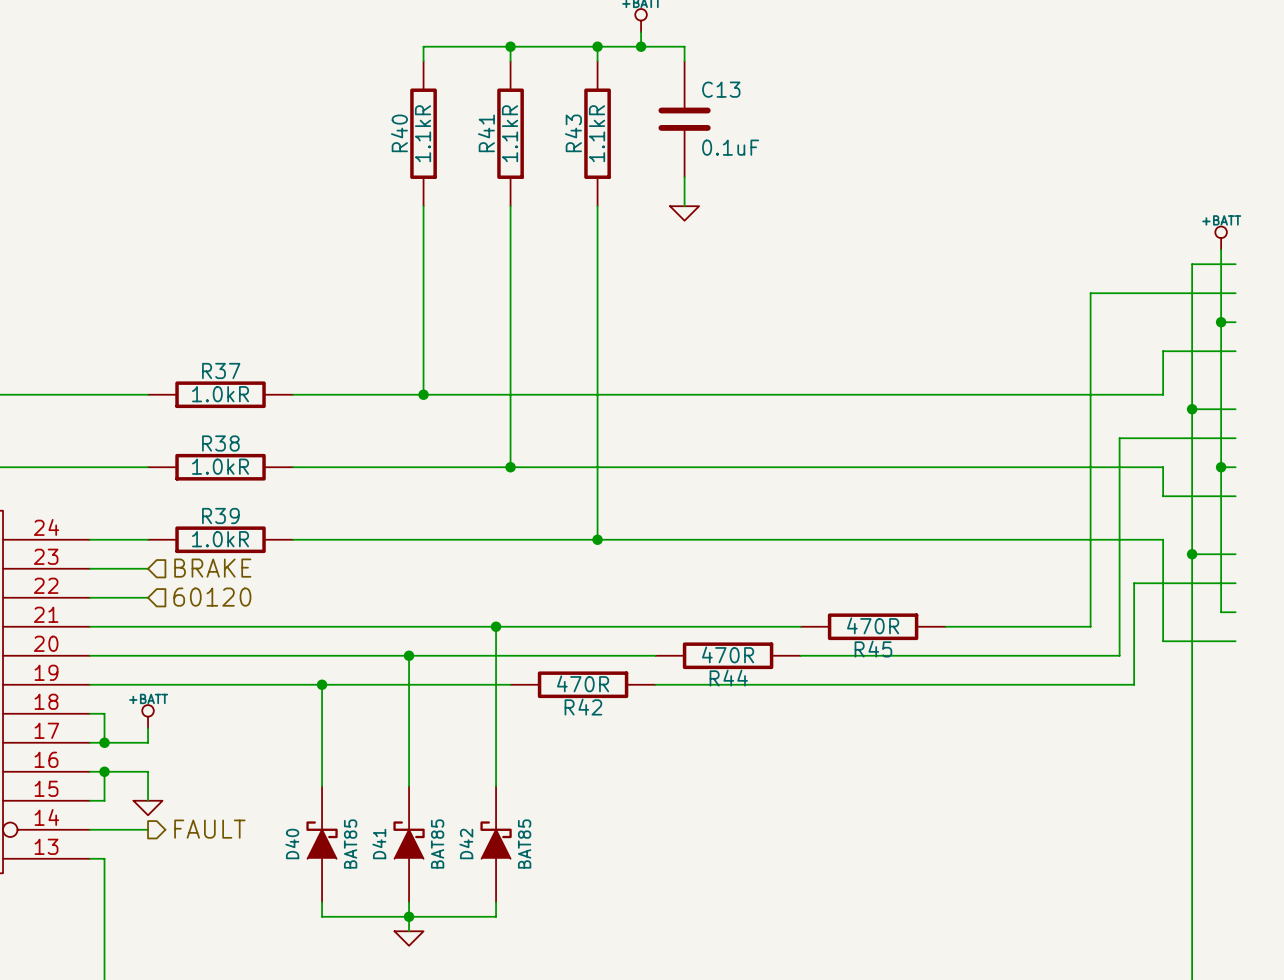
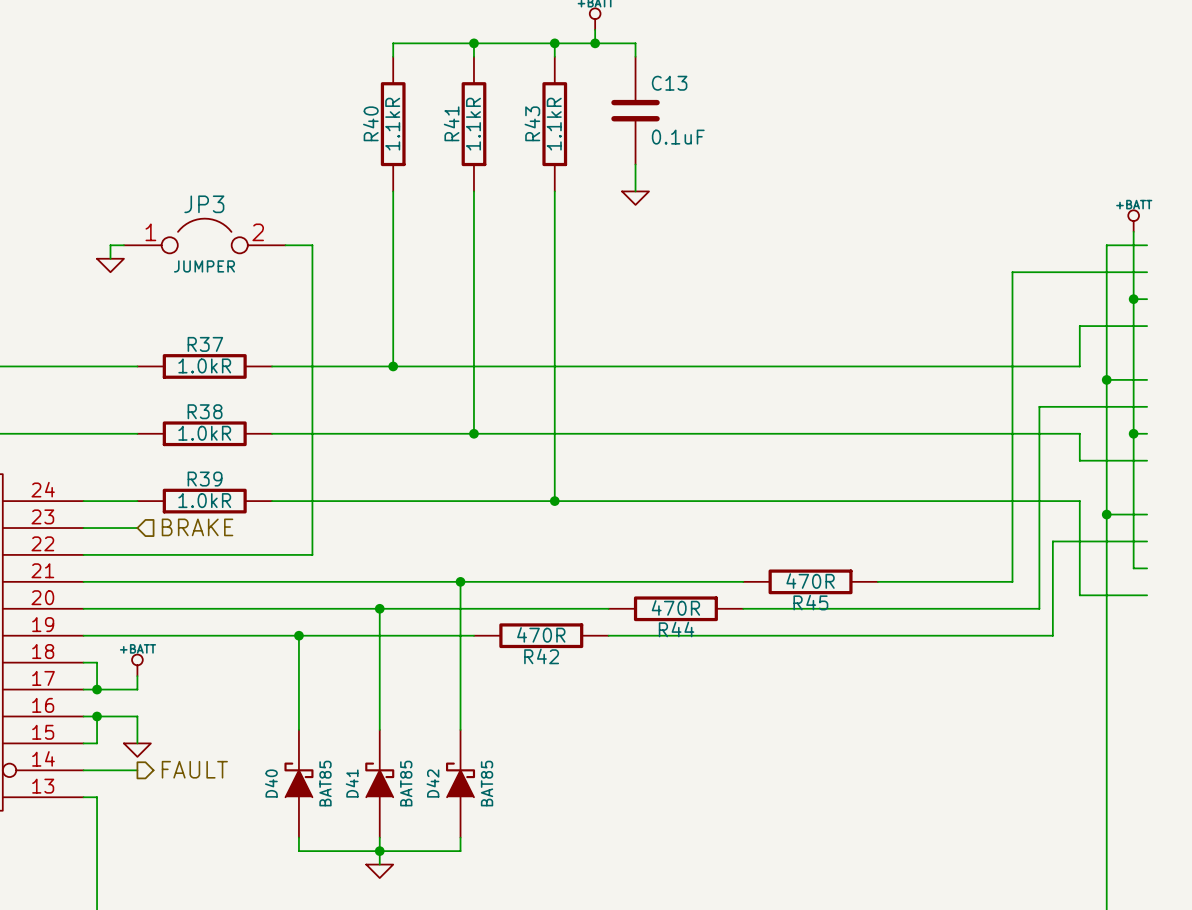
JP3: none -> JUMPER (204, 236)
wire: none -> (123, 245) (110, 245) (110, 258)
wire: none -> (285, 245) (312, 245) (312, 554) (137, 554)
power symbol: none -> (110, 265)
hierarchical label: 60120 (212, 597) -> none

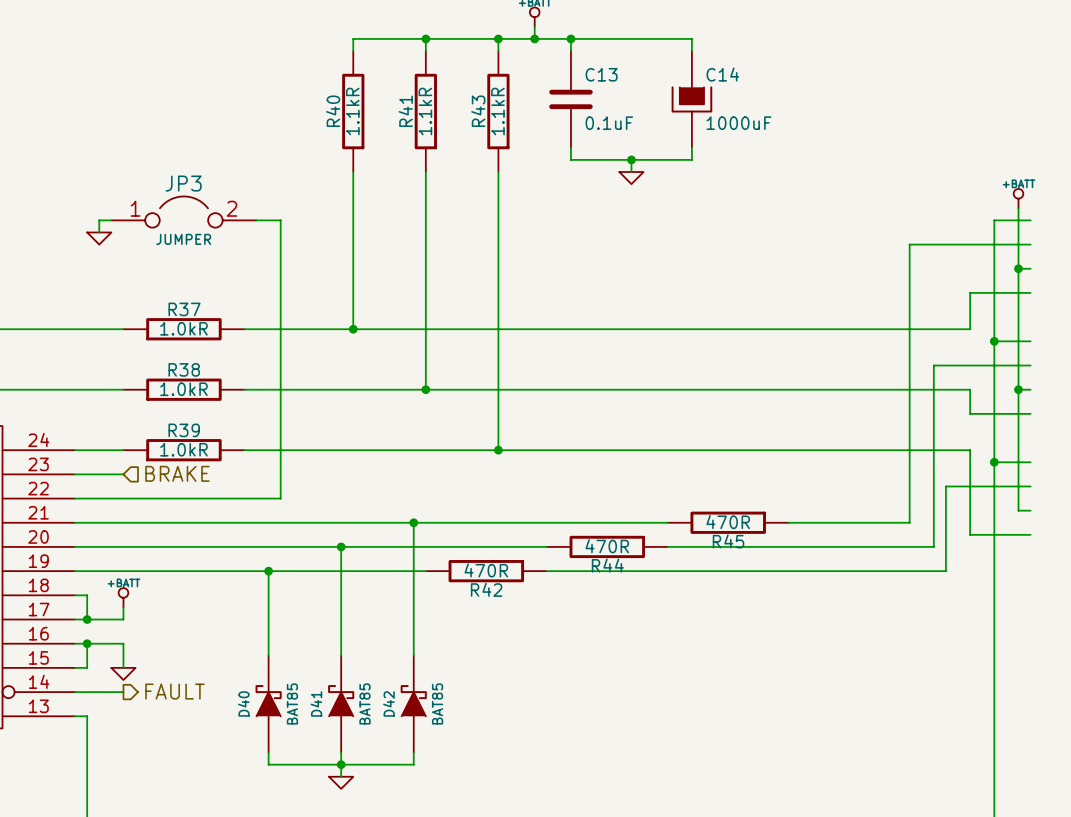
wire: none -> (570, 38) (691, 38) (691, 51)
junction: none -> (570, 38)
C14: none -> 1000uF (691, 99)
wire: (635, 177) (635, 191) -> (570, 159) (691, 159) (691, 147)
wire: none -> (631, 159) (631, 172)
junction: none -> (631, 159)
power symbol position: (635, 198) -> (631, 178)

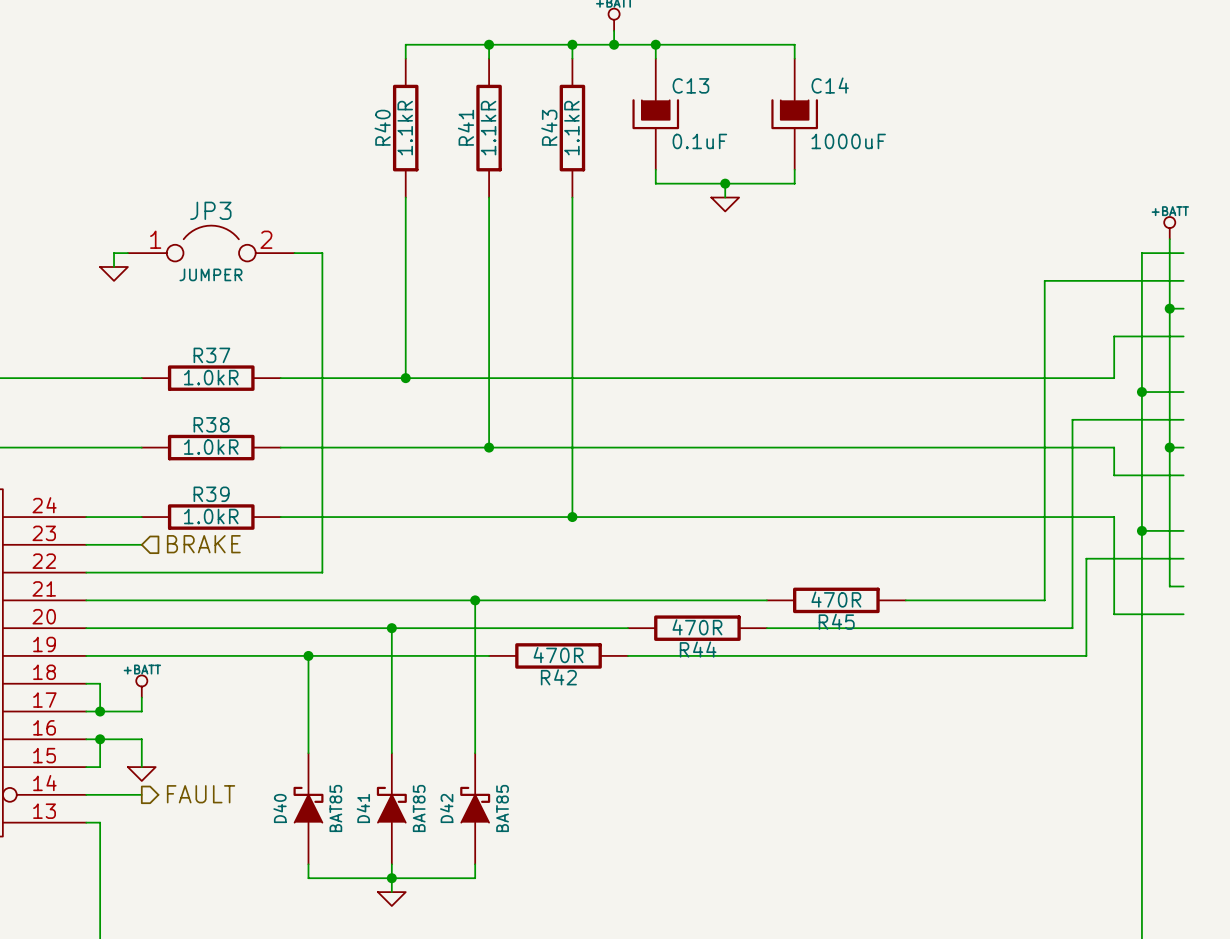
C13 symbol: [549, 51, 593, 148] -> [632, 58, 680, 170]

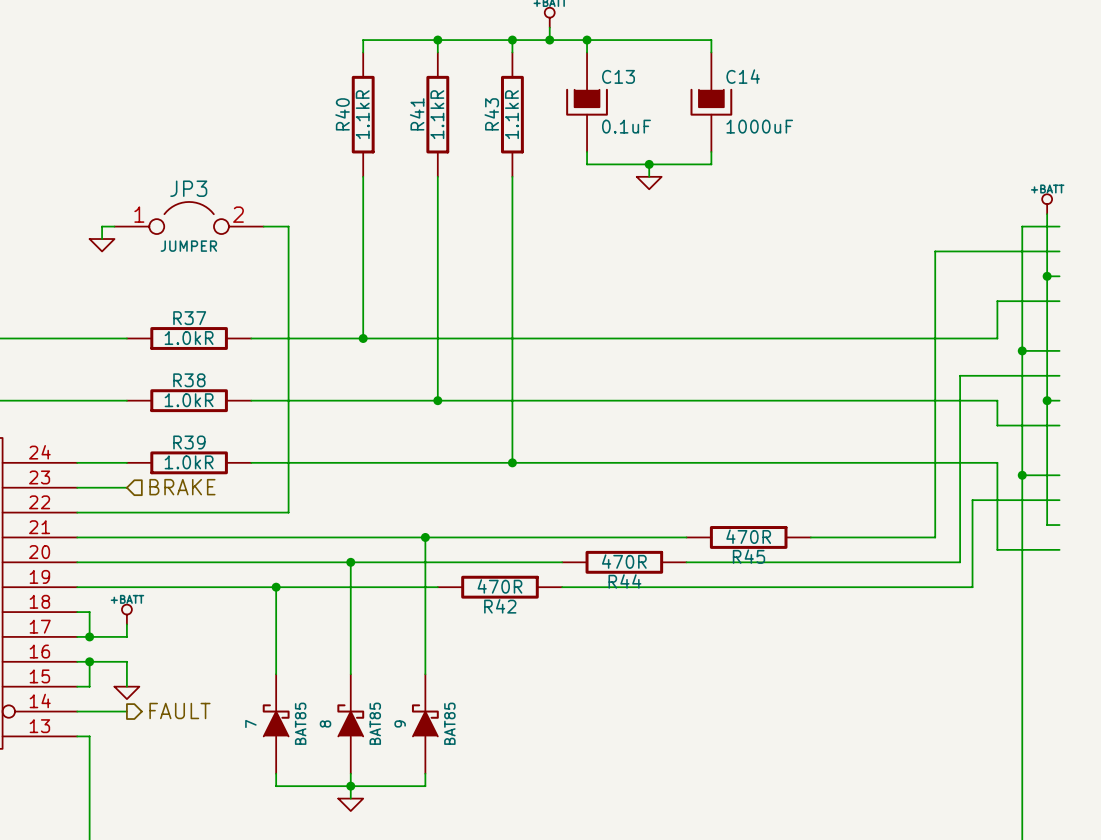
D40 name: D40 (280, 808) -> 7 (250, 723)
D41 name: D41 (363, 808) -> 8 (325, 723)
D42 name: D42 (446, 808) -> 9 (400, 723)

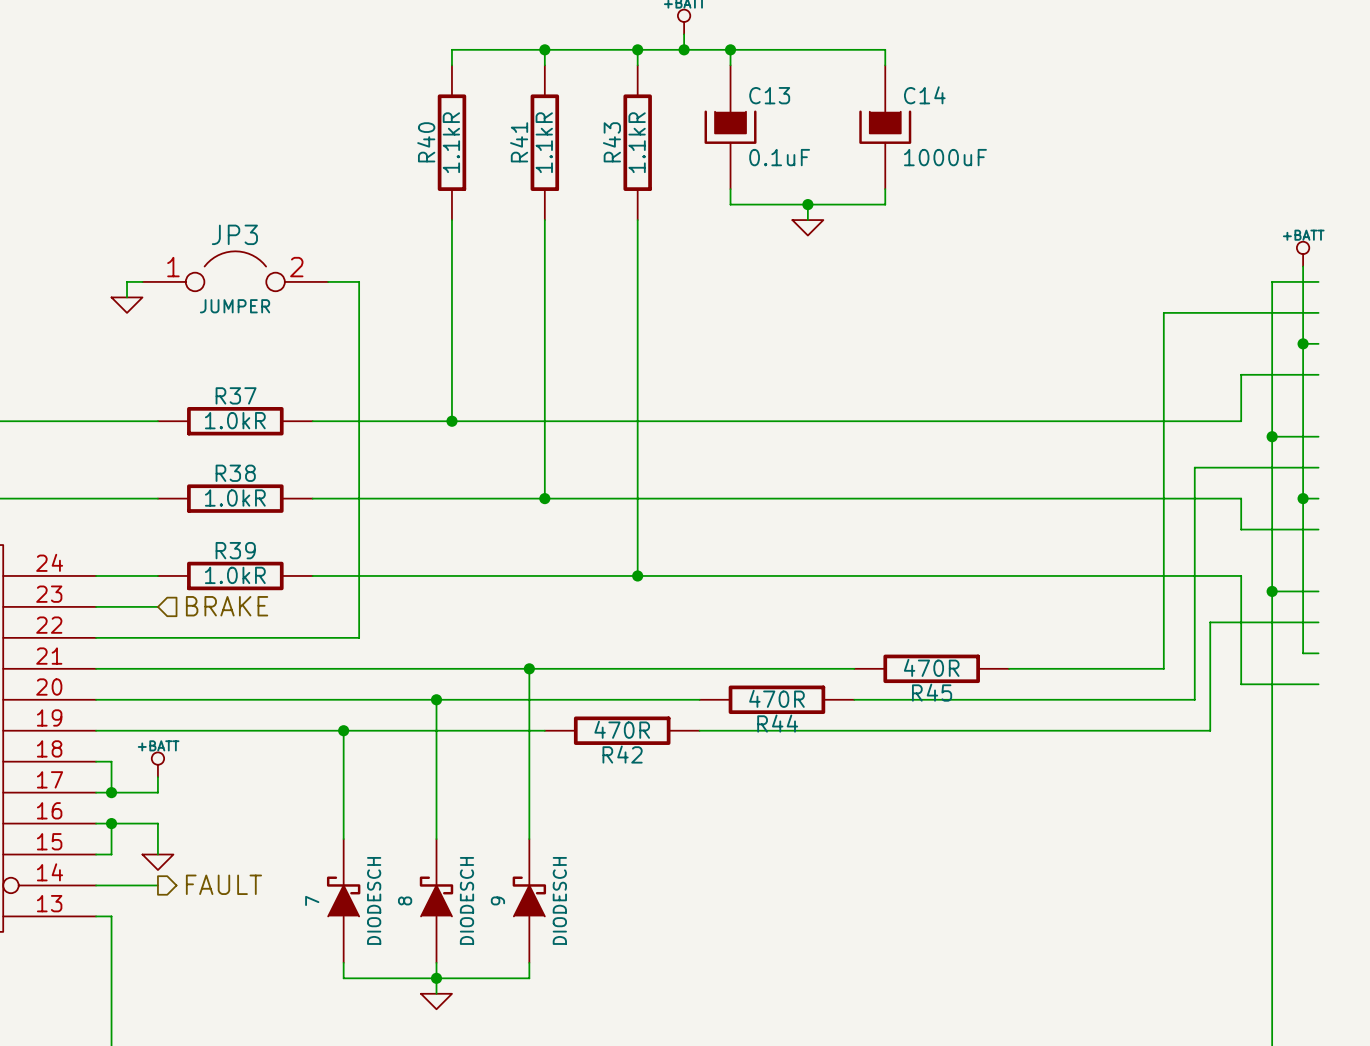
7 value: BAT85 (300, 723) -> DIODESCH (374, 900)
8 value: BAT85 (375, 723) -> DIODESCH (466, 900)
9 value: BAT85 (449, 723) -> DIODESCH (559, 900)

